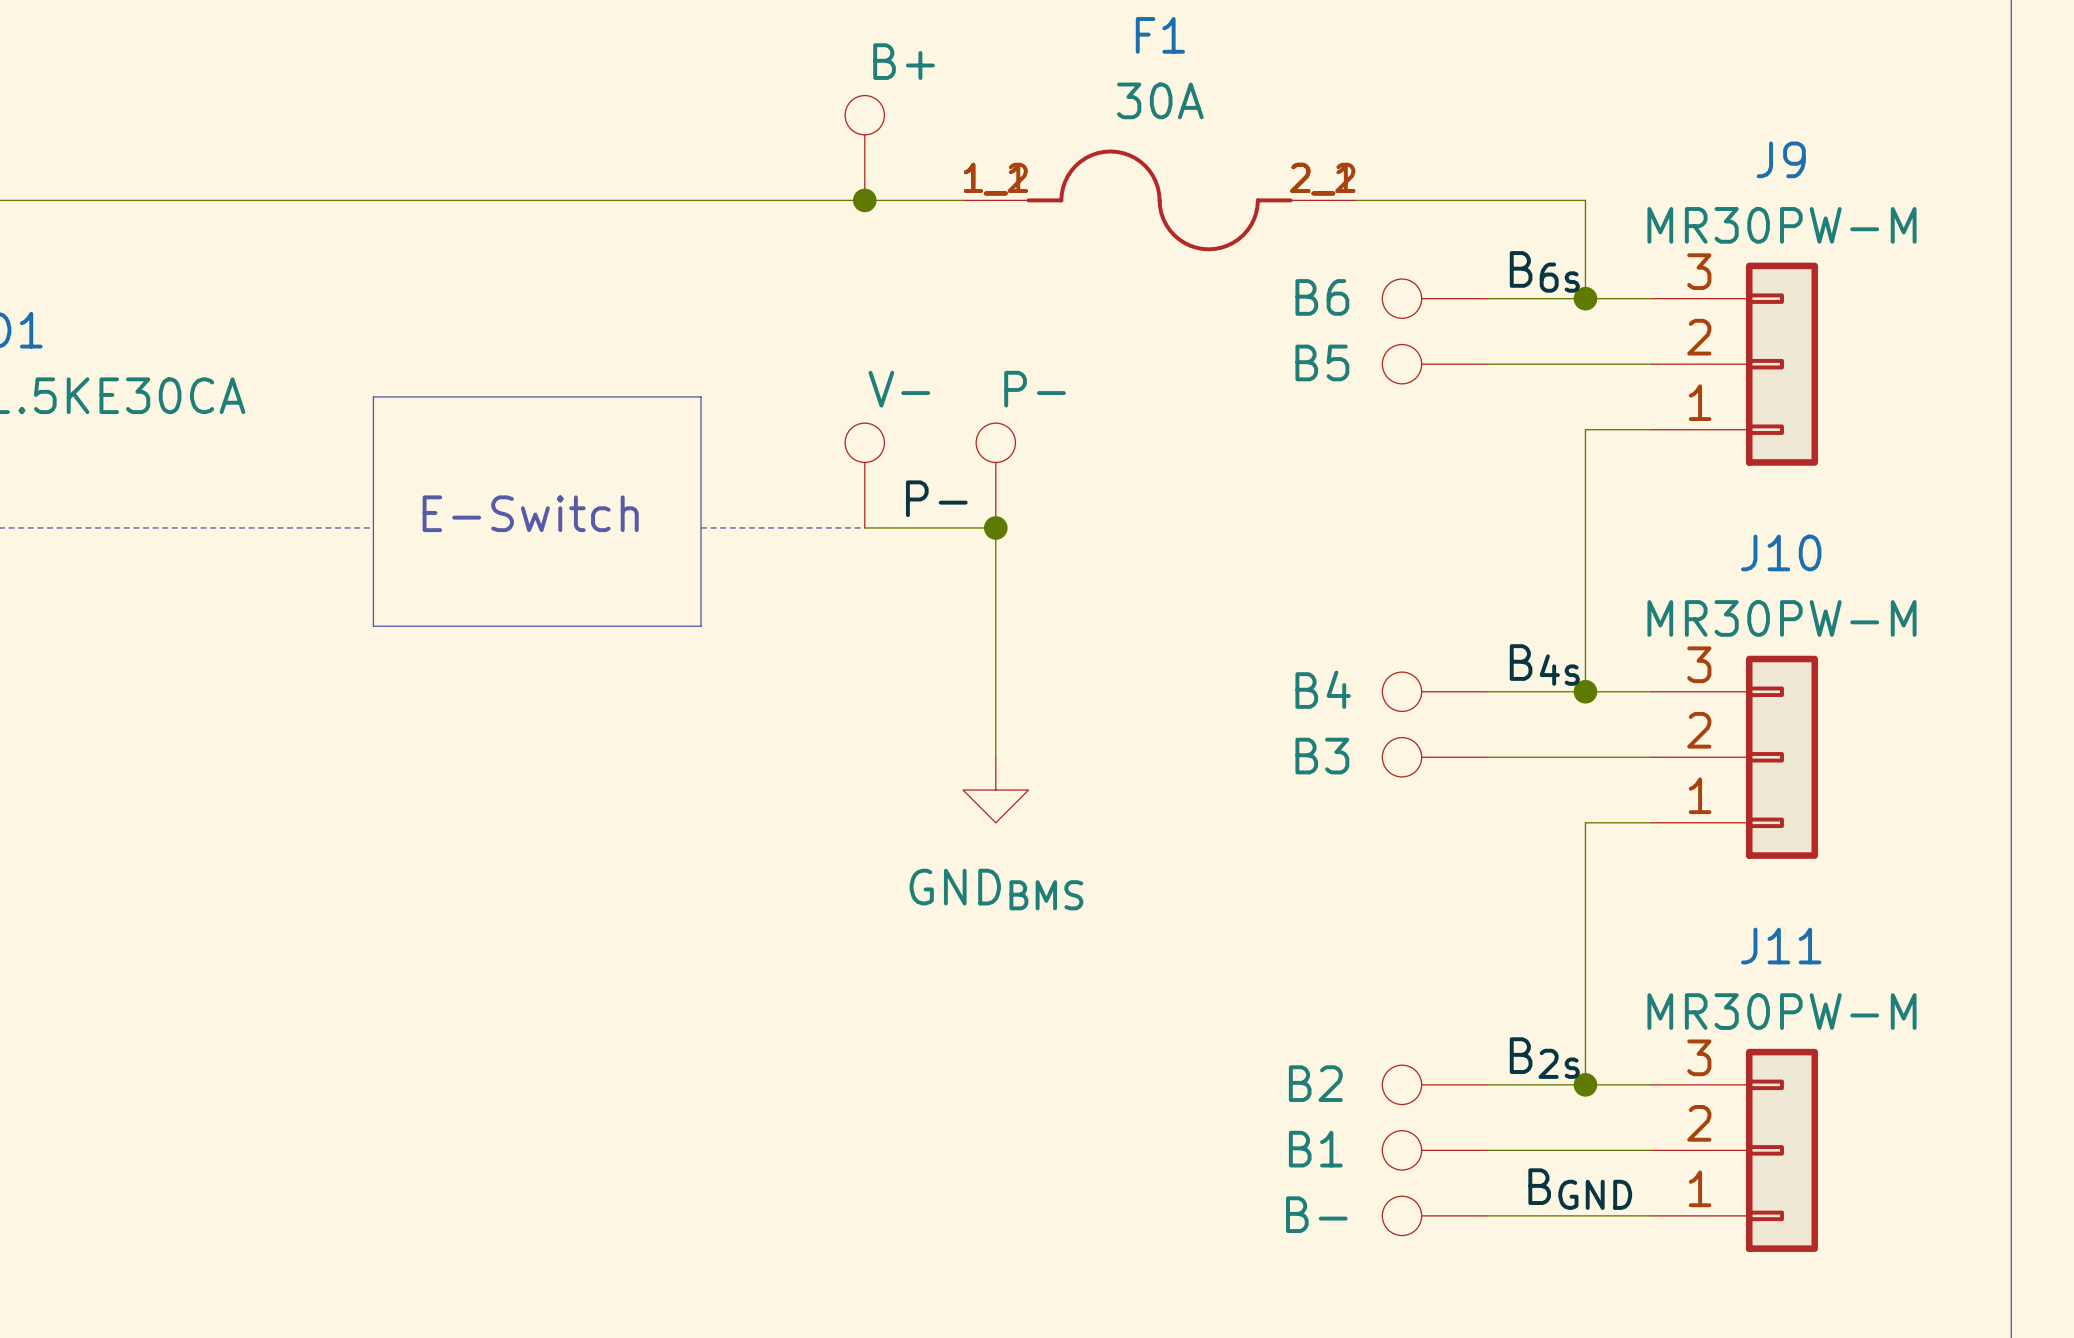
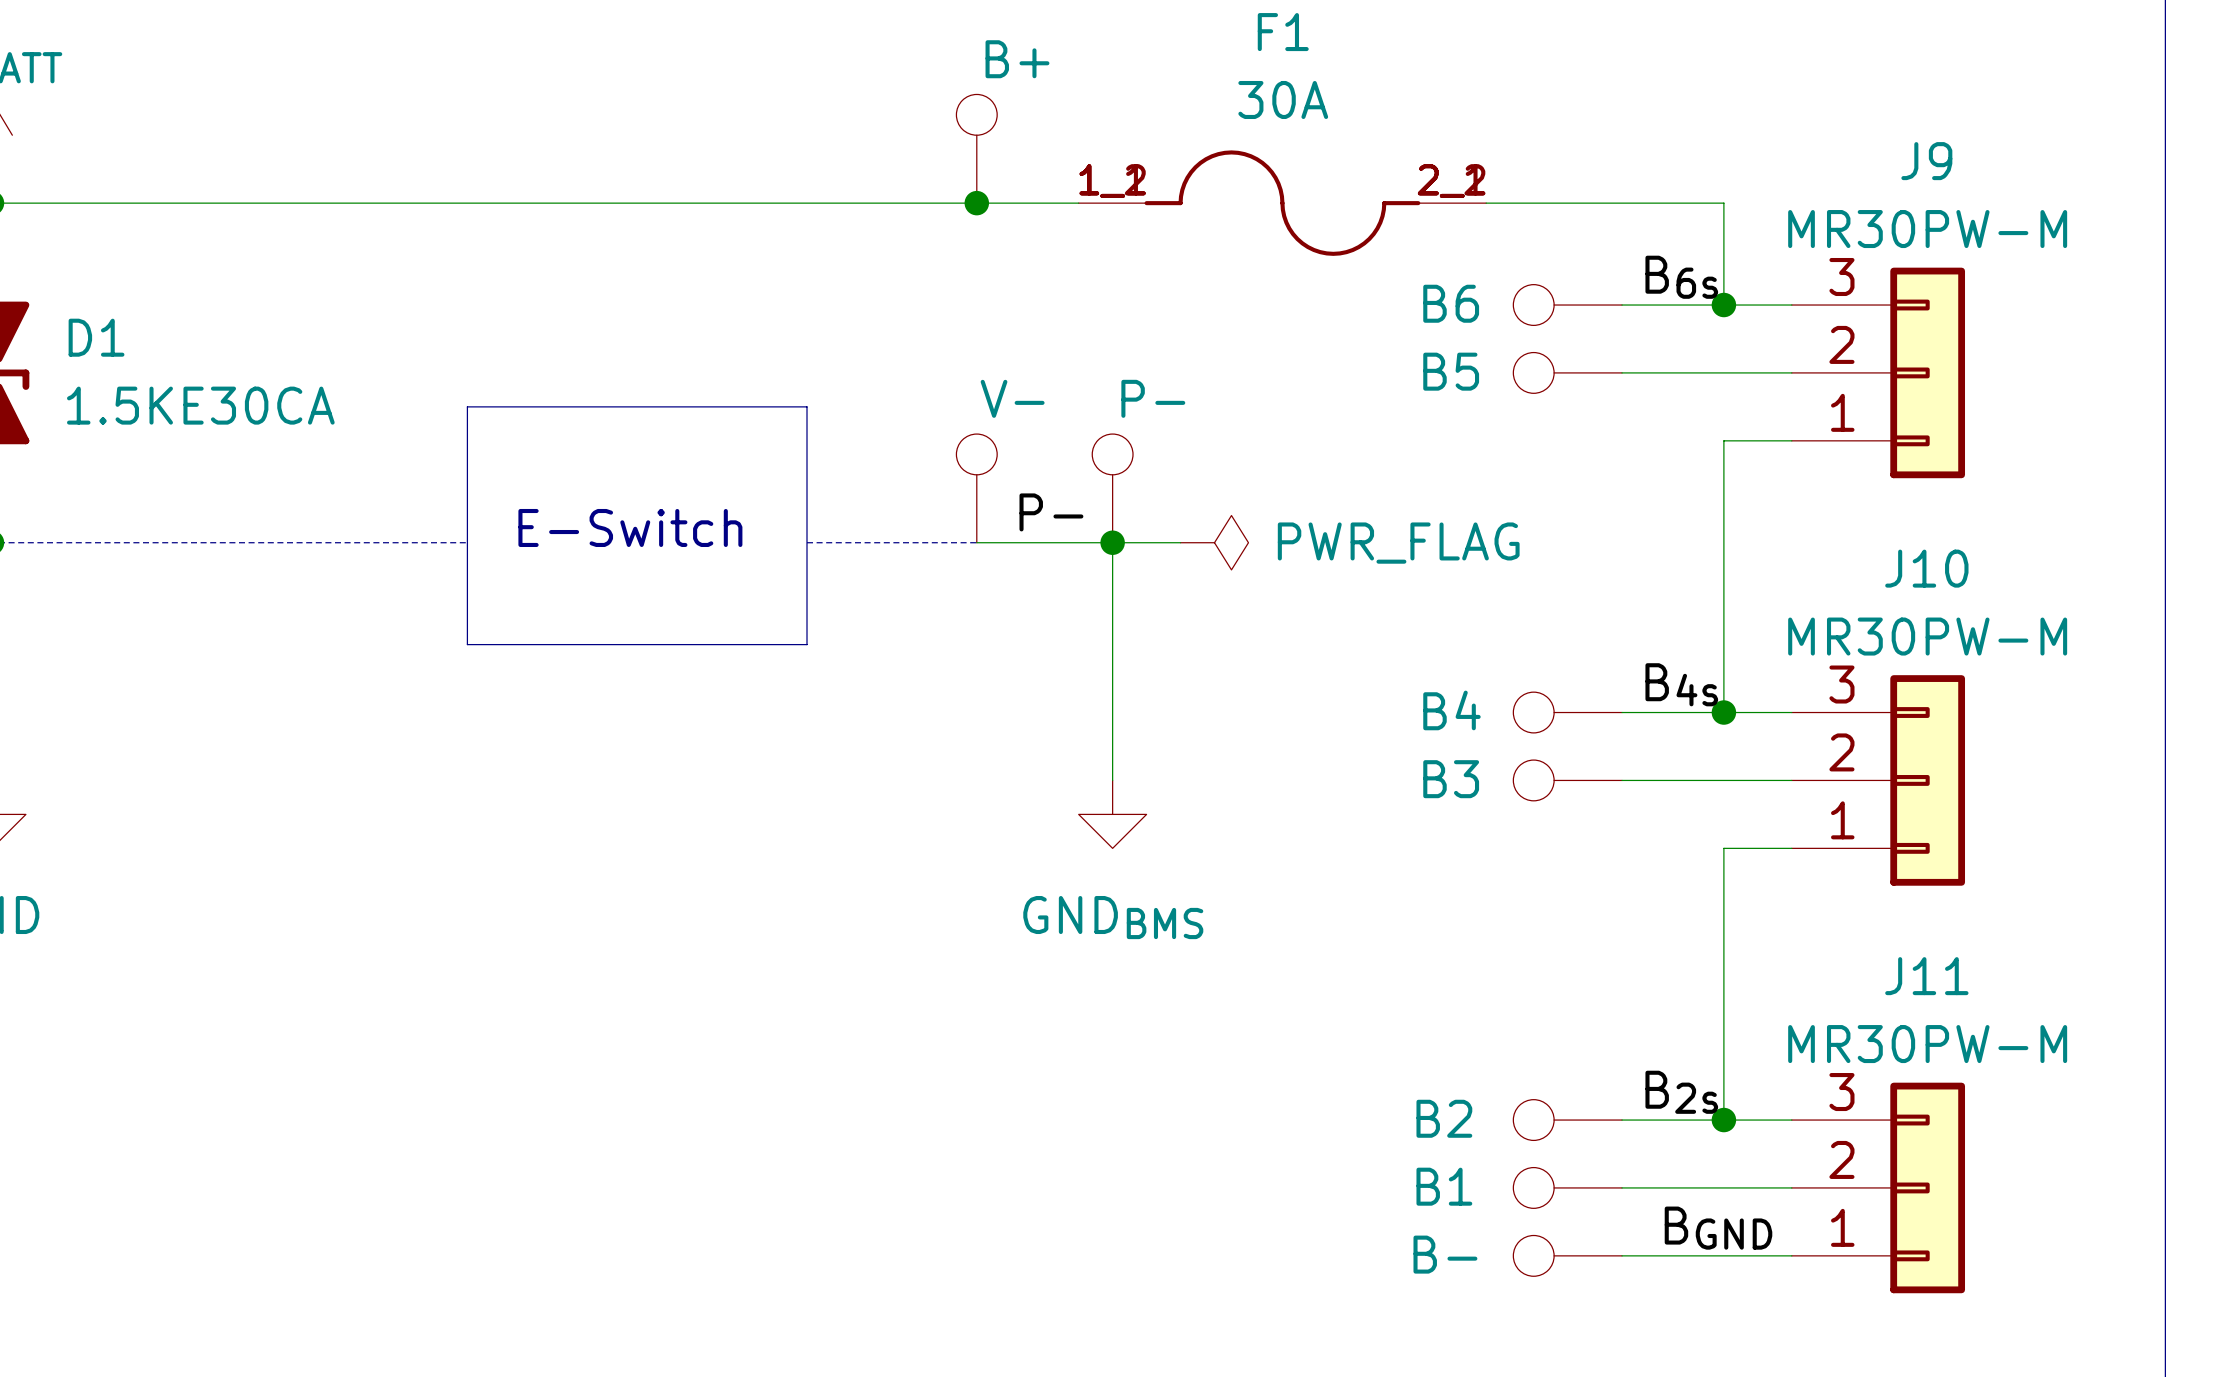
wire: none -> (1112, 542) (1180, 542)
power symbol: none -> PWR_FLAG (1214, 542)

